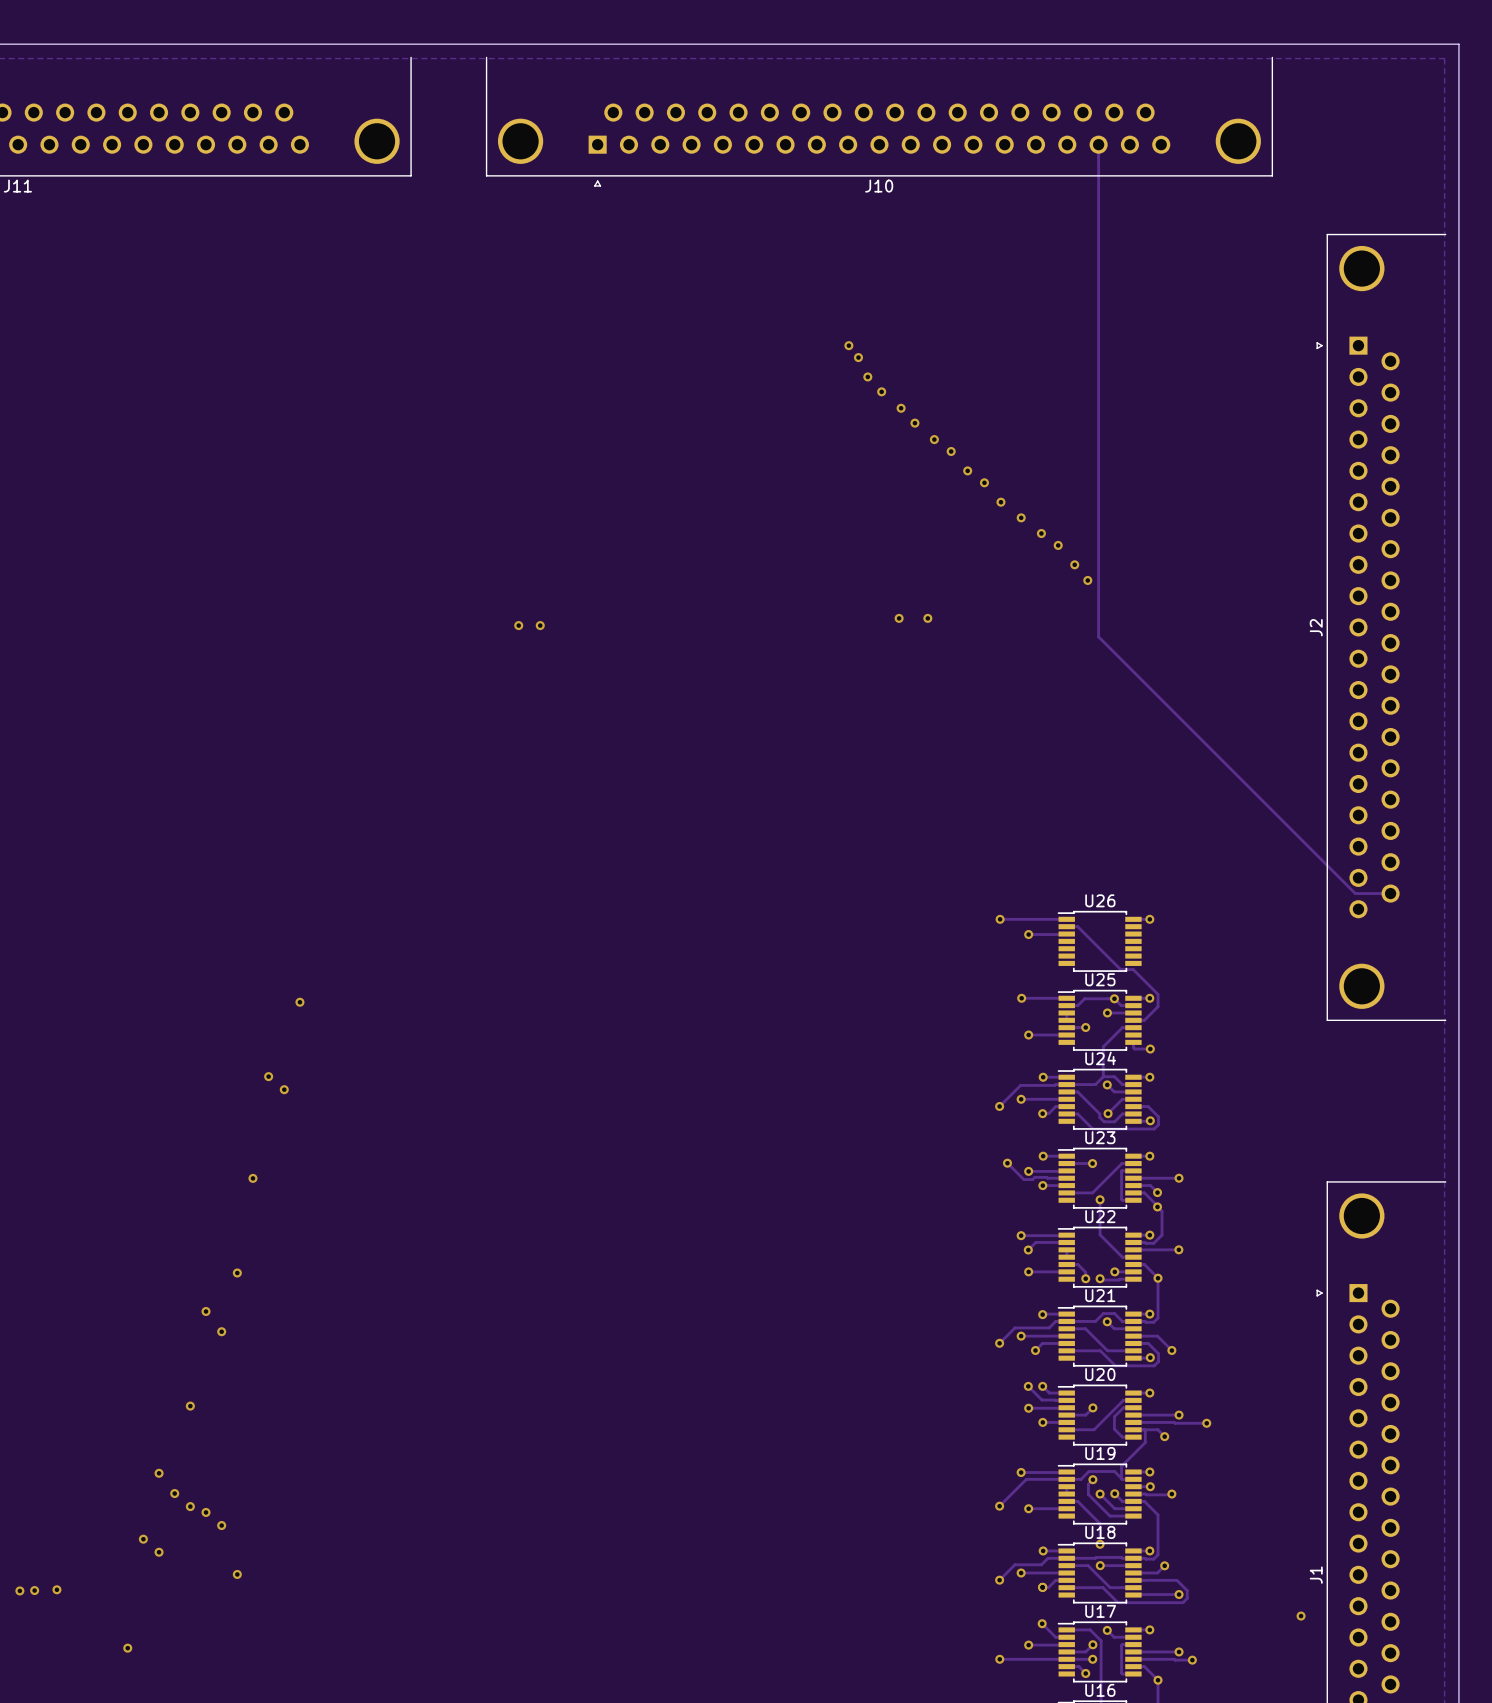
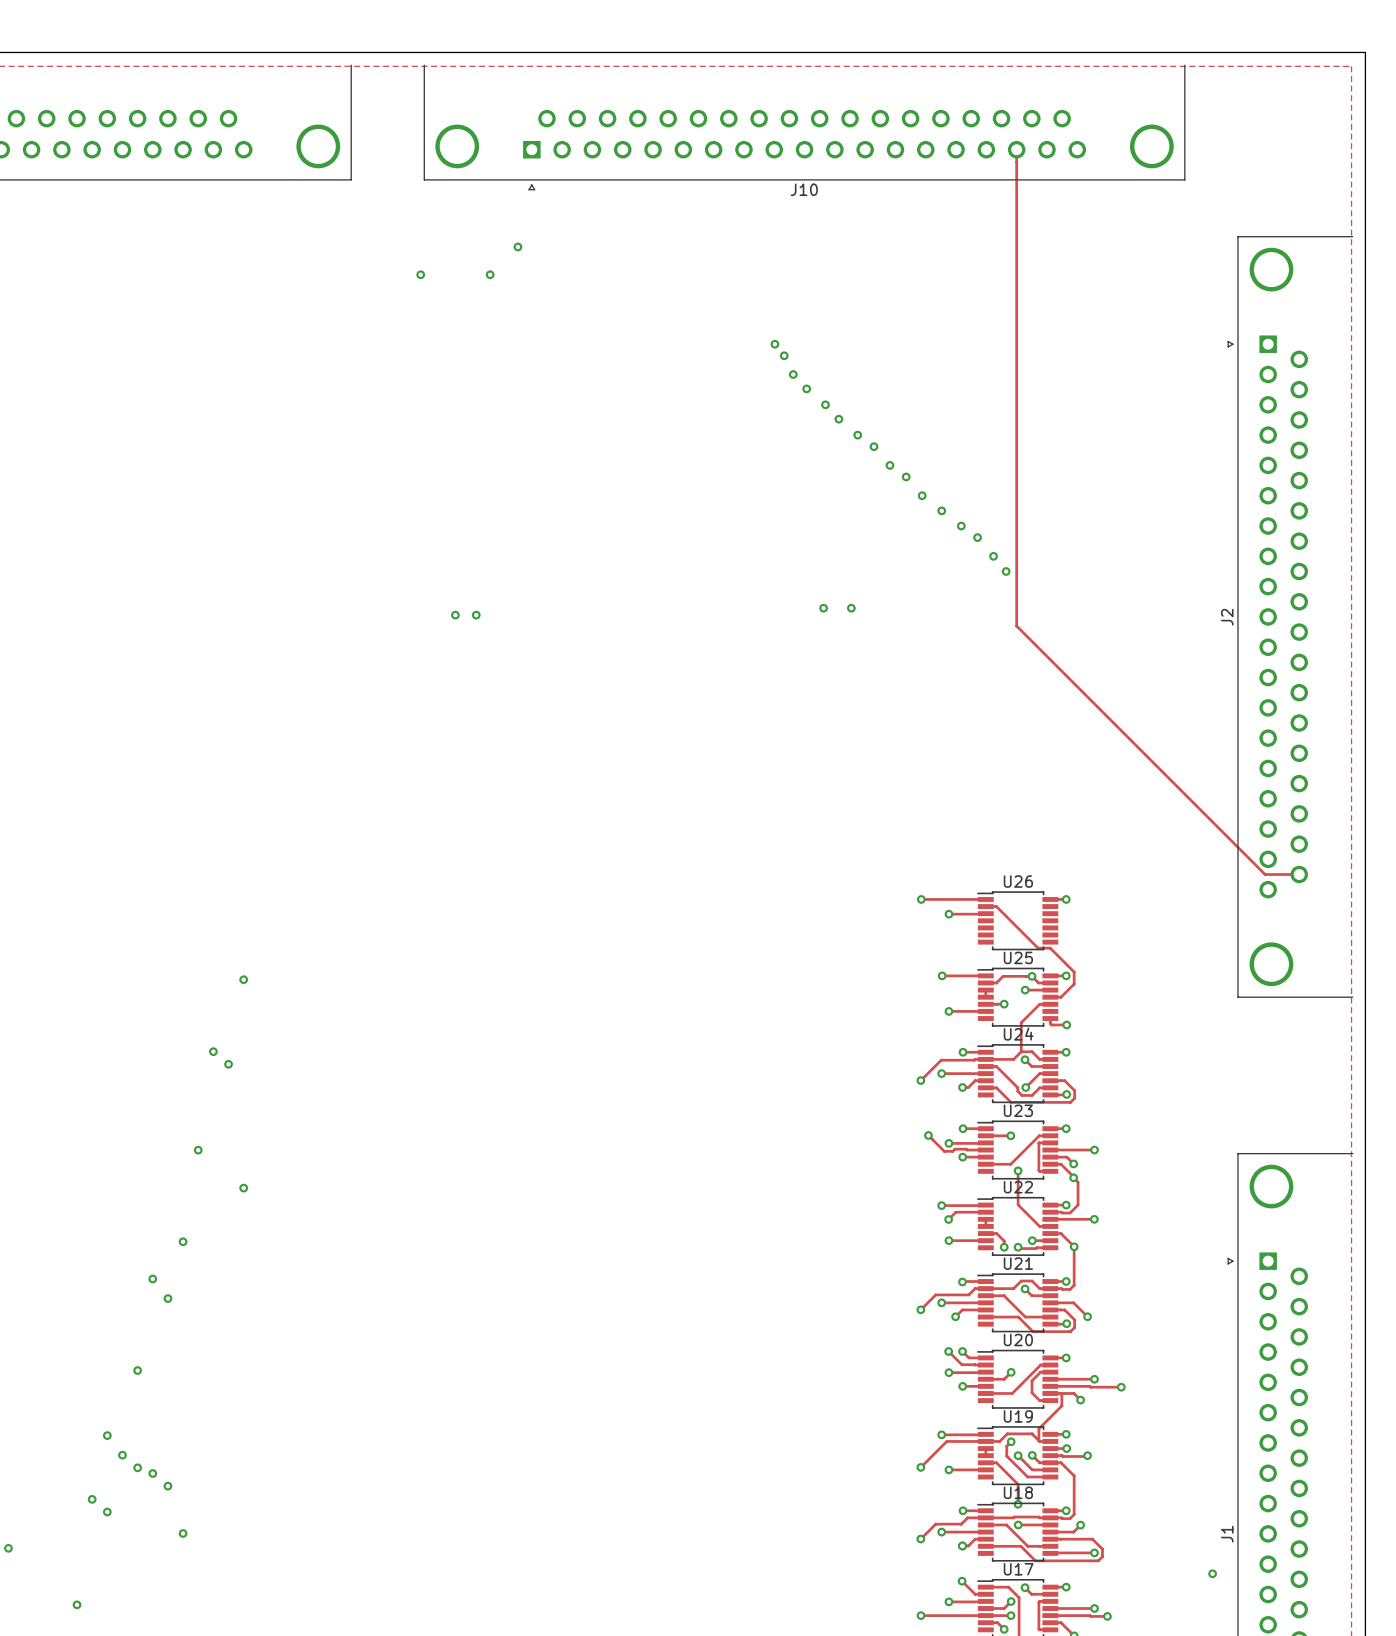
via: none -> (517, 246)
via: none -> (420, 274)
via: none -> (490, 274)
via: none -> (243, 1188)

